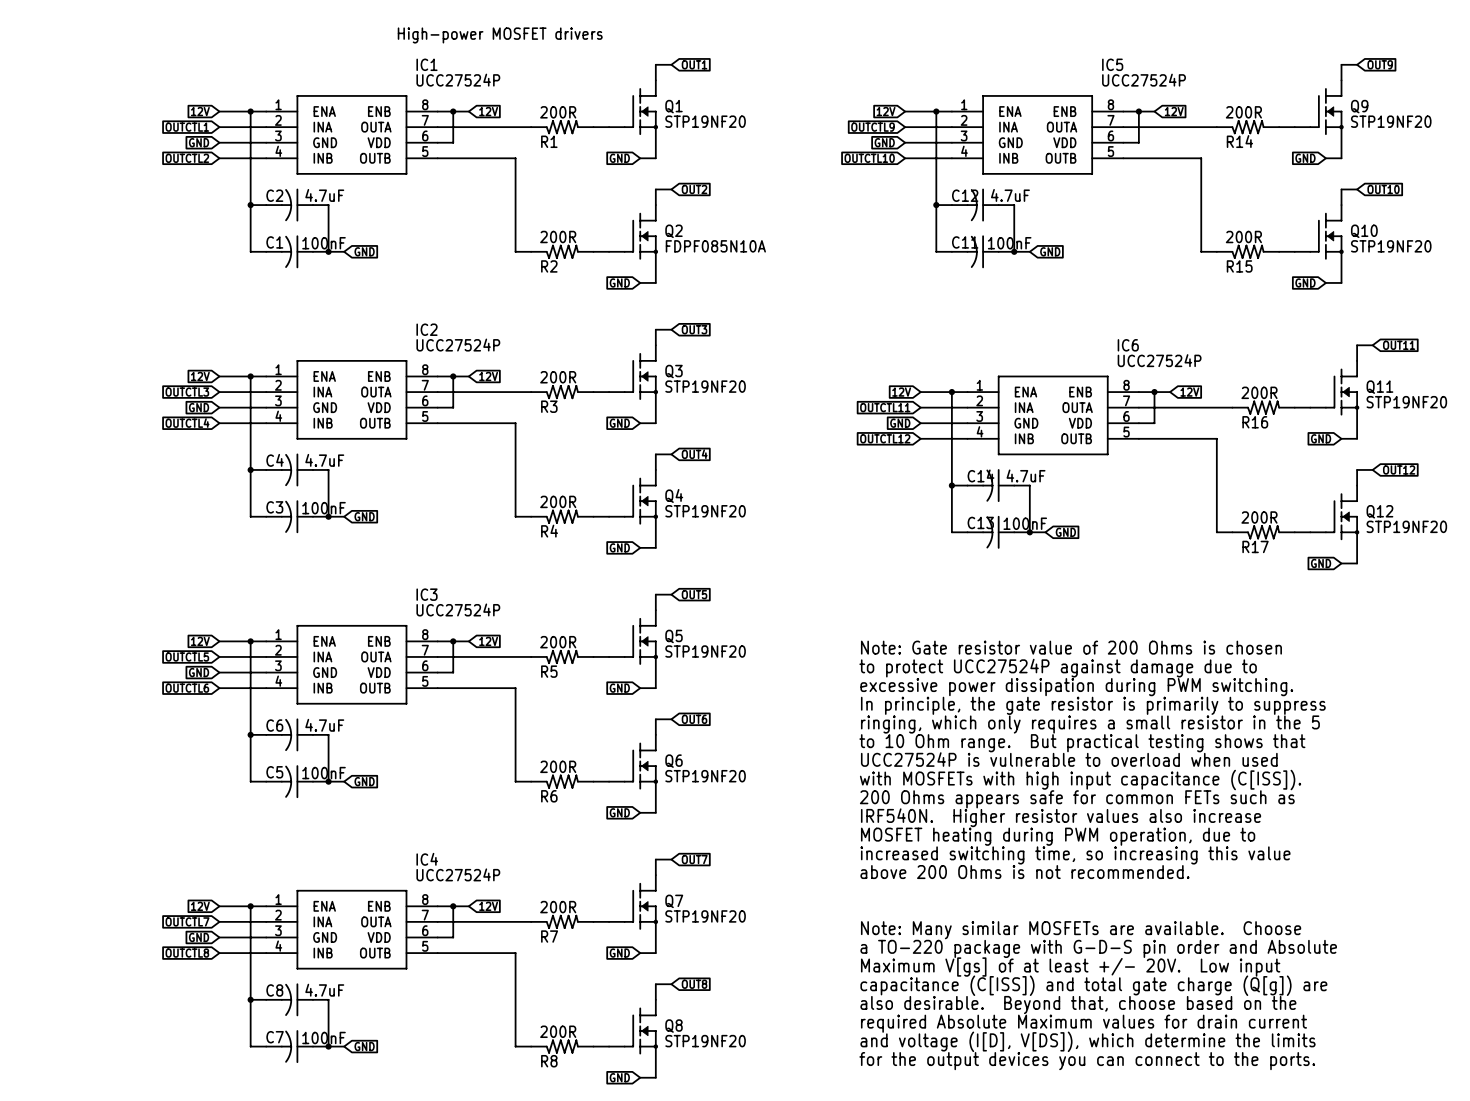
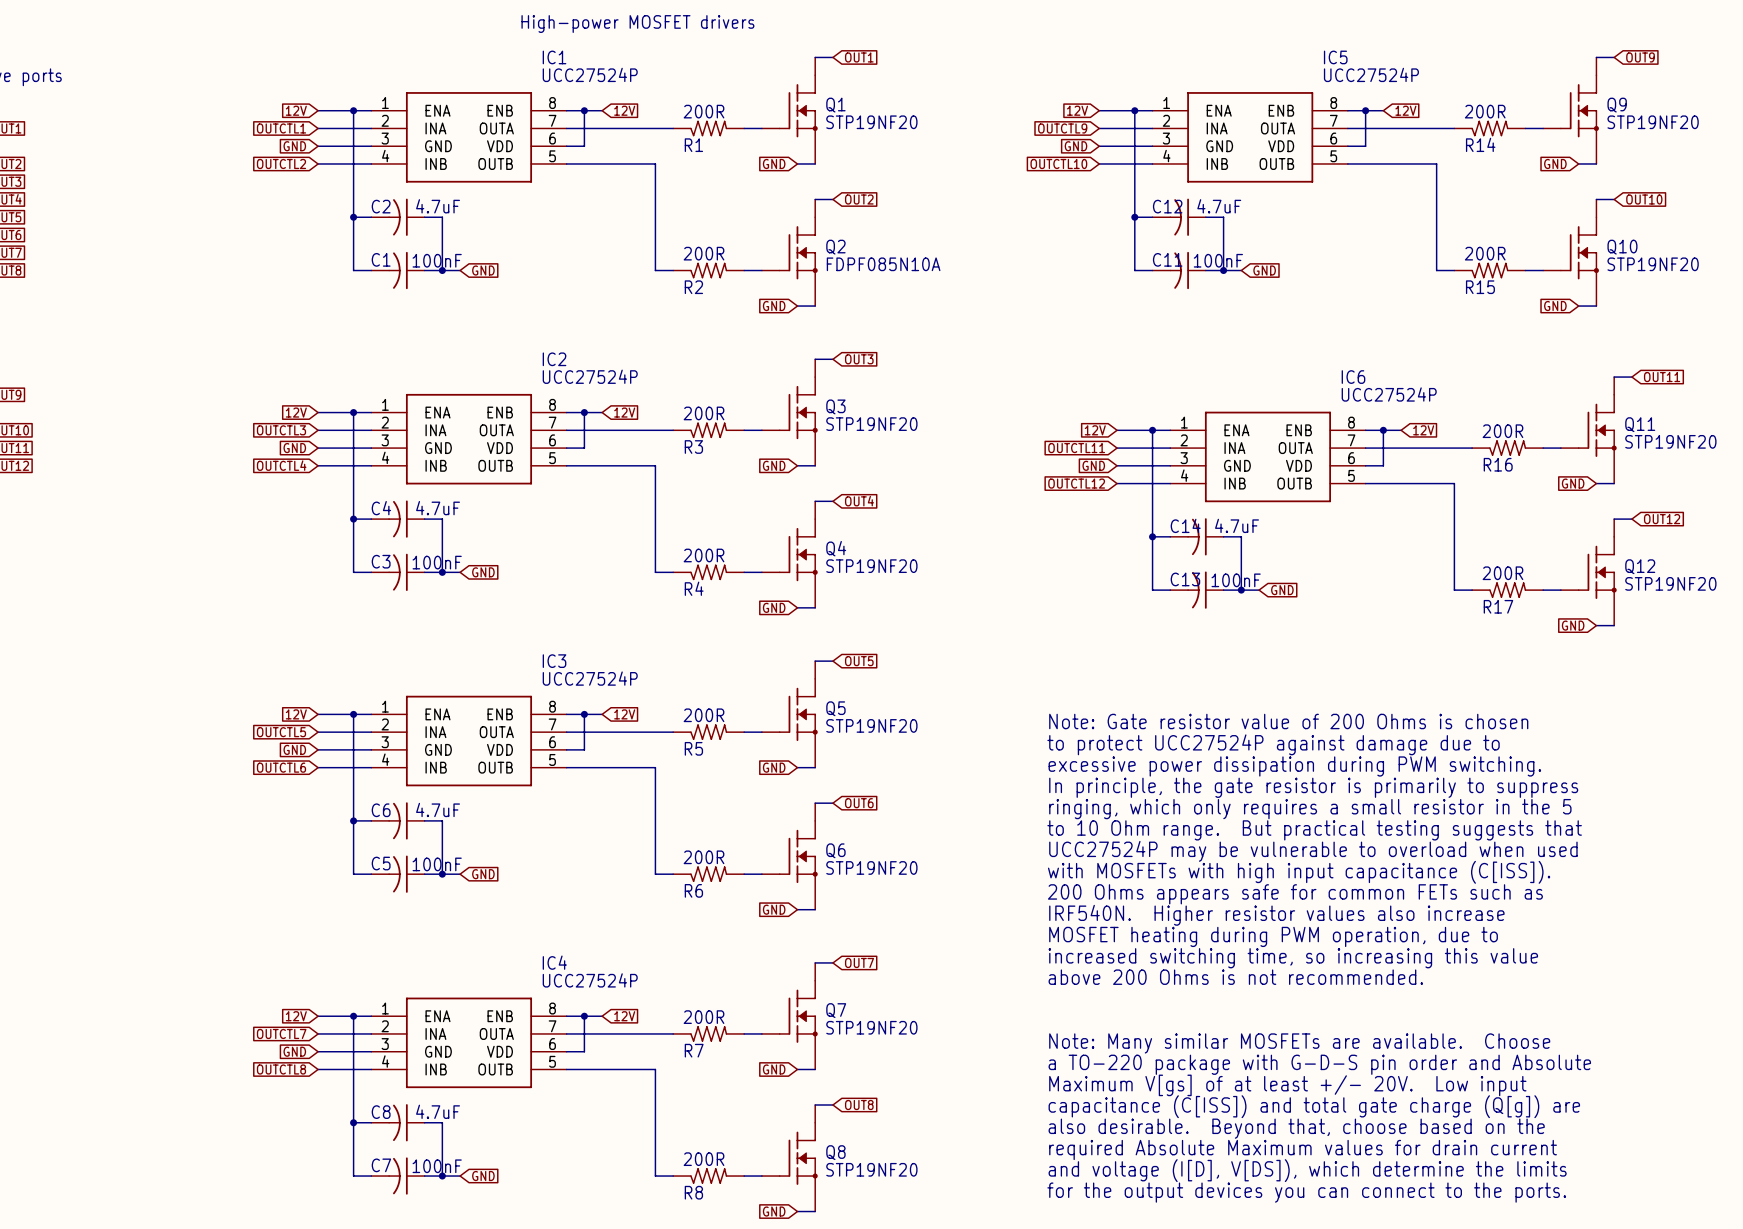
text: to 10 Ohm range. But practical testing shows that (1082, 743) -> to 10 Ohm range. But practical testing suggests that (1314, 830)
text: UCC27524P is vulnerable to overload when used (1069, 759) -> UCC27524P may be vulnerable to overload when used (1313, 851)

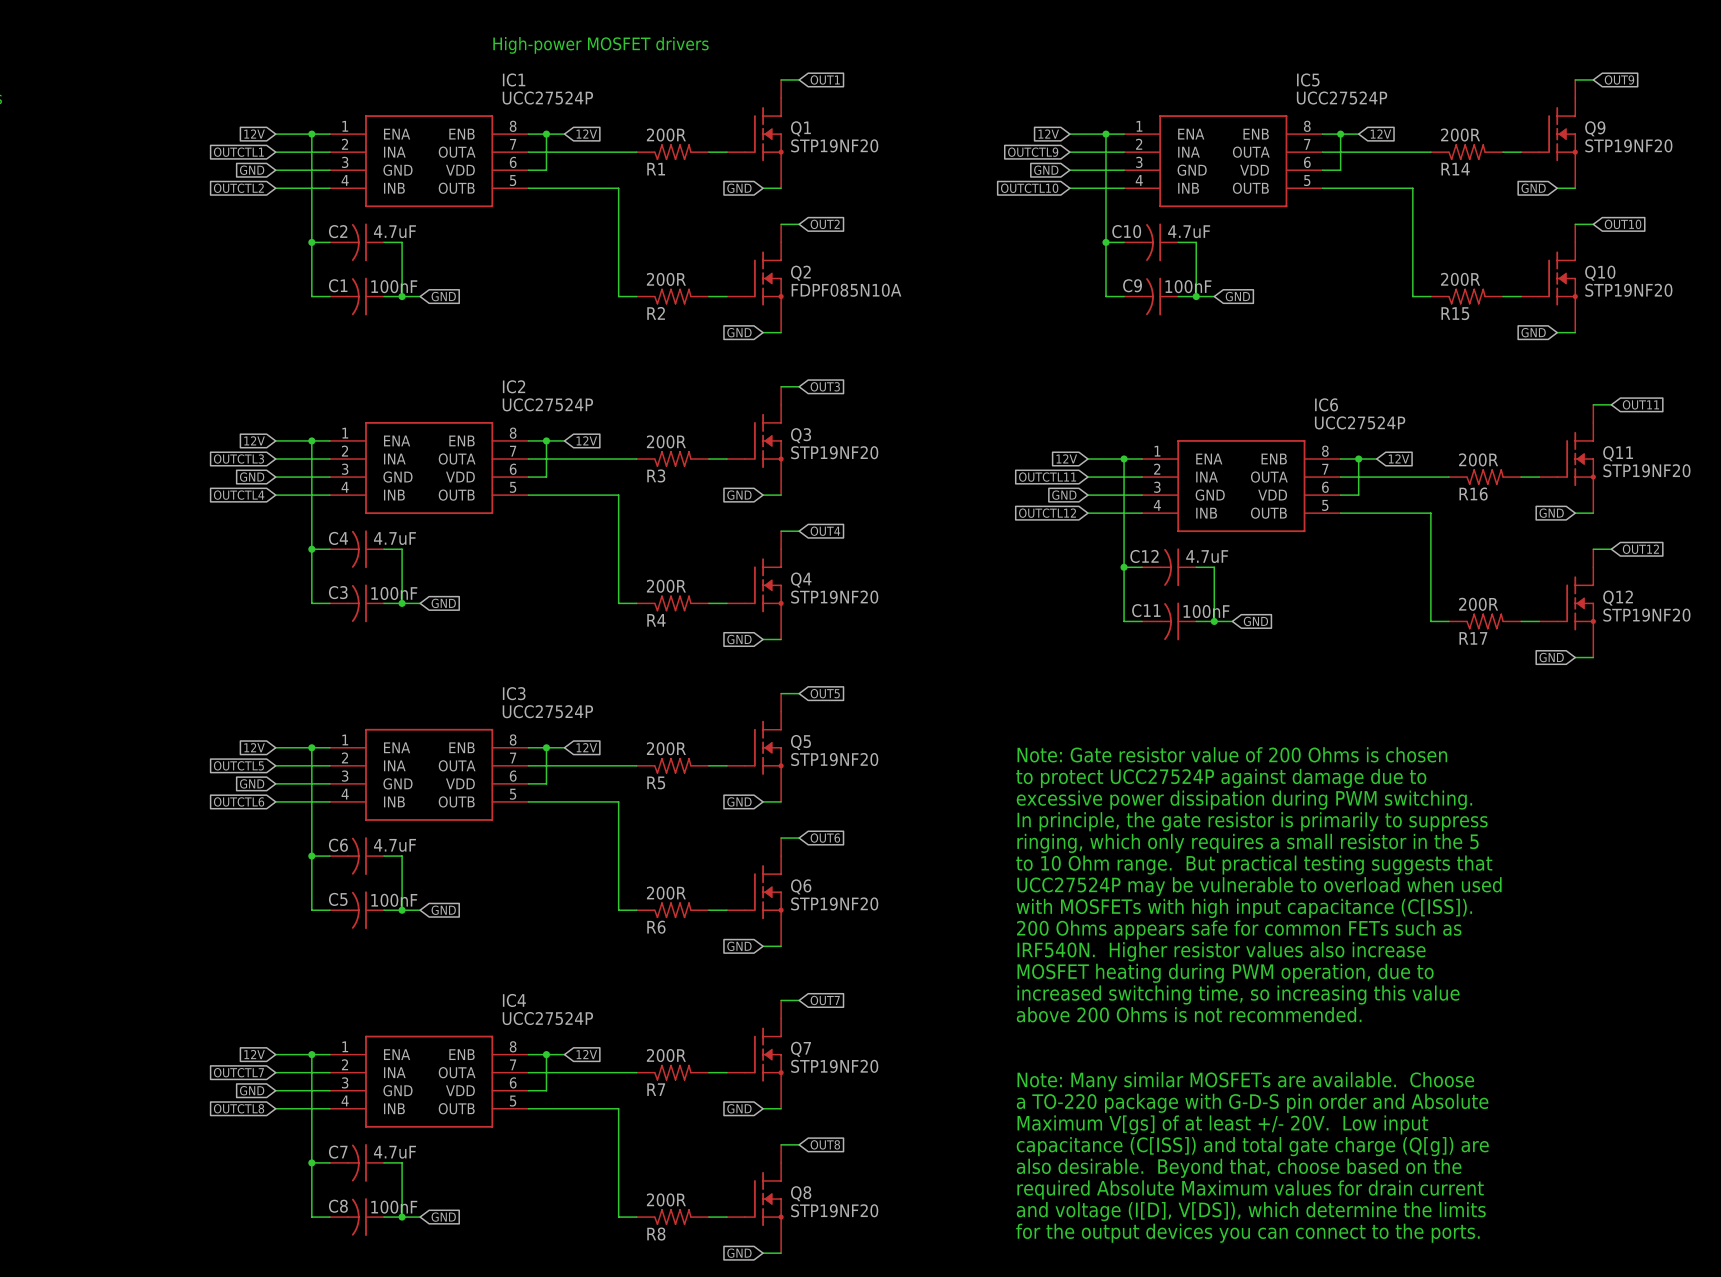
C12 name: C12 (1167, 206) -> C10 (1126, 231)
C11 name: C11 (1167, 259) -> C9 (1132, 285)
C14 name: C14 (1185, 525) -> C12 (1144, 556)
C13 name: C13 (1185, 579) -> C11 (1146, 610)
C8 name: C8 (381, 1112) -> C7 (338, 1152)
C7 name: C7 (381, 1165) -> C8 (338, 1206)

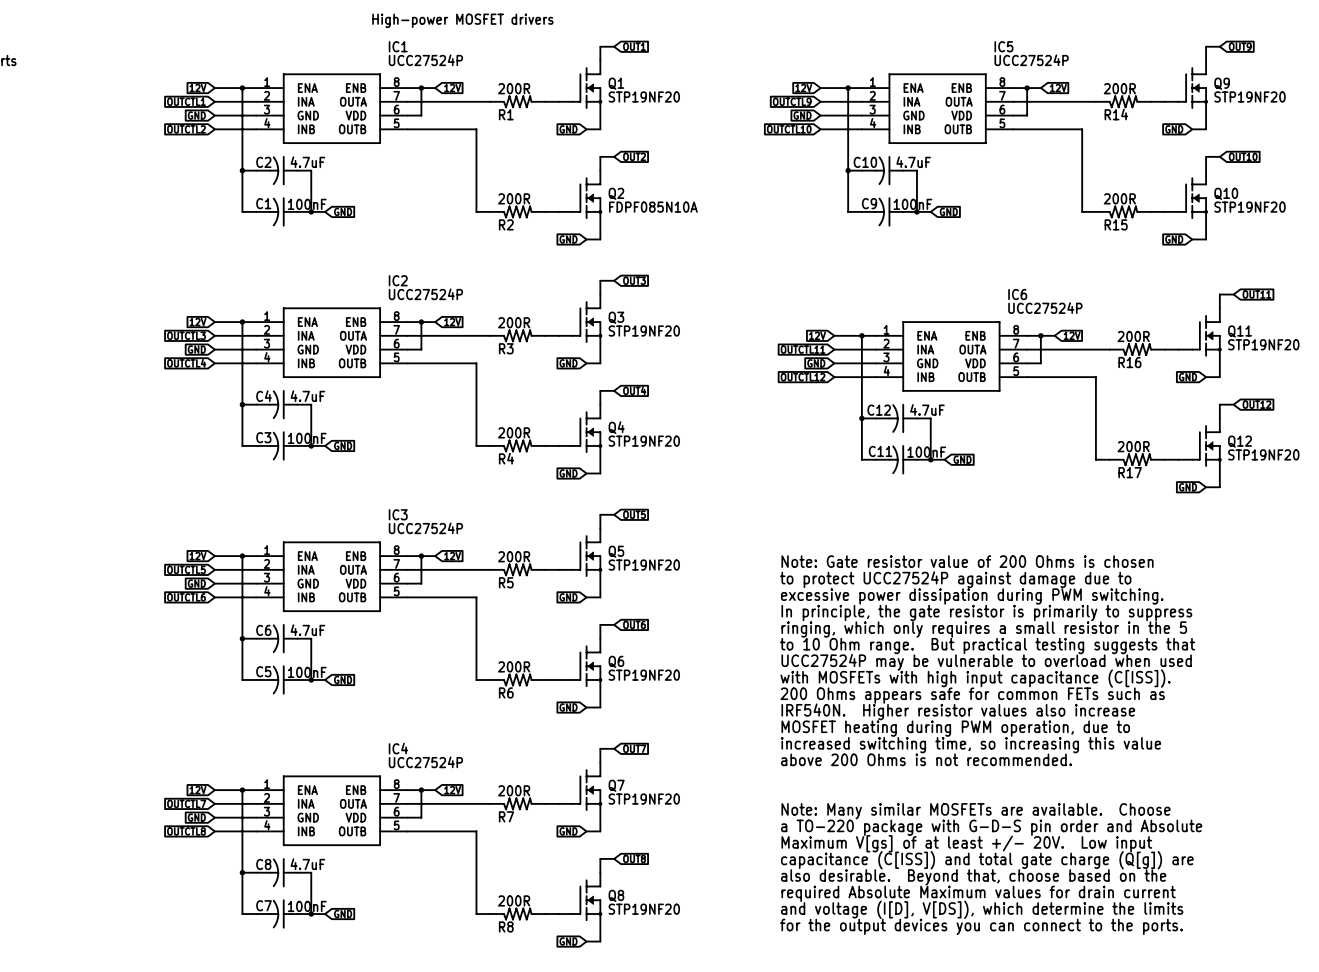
C7 name: C7 (338, 1152) -> C8 (263, 864)
C8 name: C8 (338, 1206) -> C7 (264, 905)

